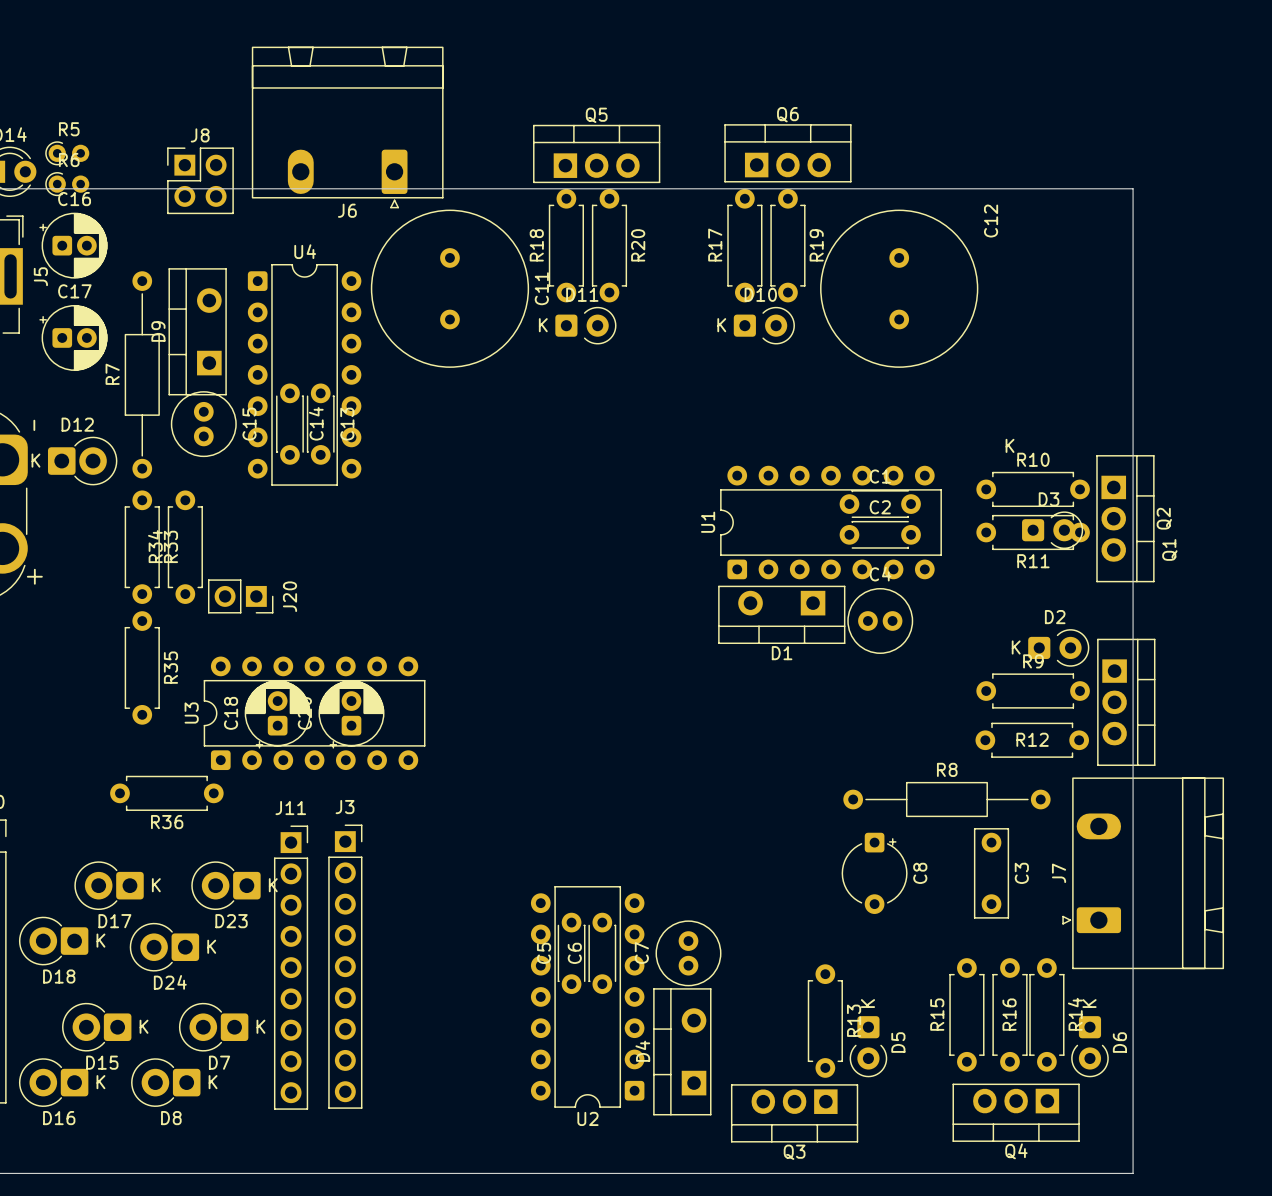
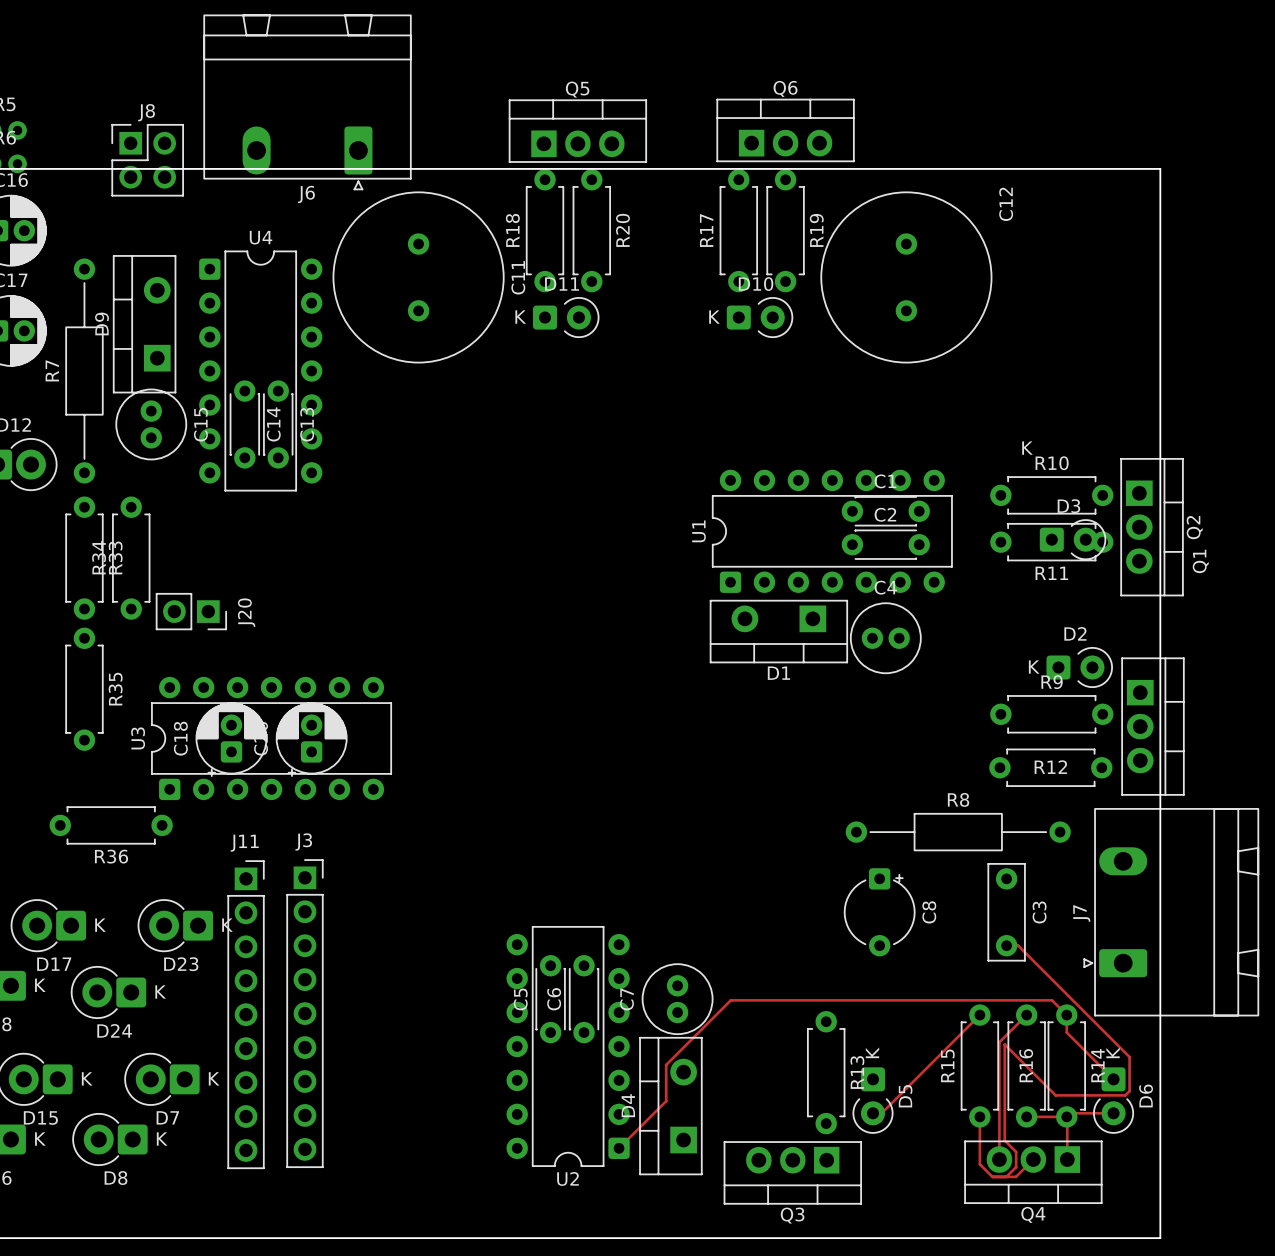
track: none -> (1006, 945) (1018, 945) (1129, 1057) (1129, 1091) (1125, 1095) (1055, 1095) (1004, 1044) (1004, 1140) (1016, 1151) (1016, 1167) (1006, 1176)
track: none -> (979, 1015) (881, 1113) (872, 1113)
track: none -> (1026, 1015) (999, 1042) (999, 1159)
track: none -> (1113, 1079) (1066, 1032) (1066, 1015) (1052, 1000) (730, 1000) (666, 1064) (666, 1101) (619, 1148)
track: none -> (1113, 1113) (1070, 1113) (1066, 1116)
track: none -> (979, 1116) (979, 1164) (992, 1176) (1015, 1176) (1033, 1159)
track: none -> (1026, 1116) (1066, 1116)
track: none -> (1066, 1116) (1067, 1159)

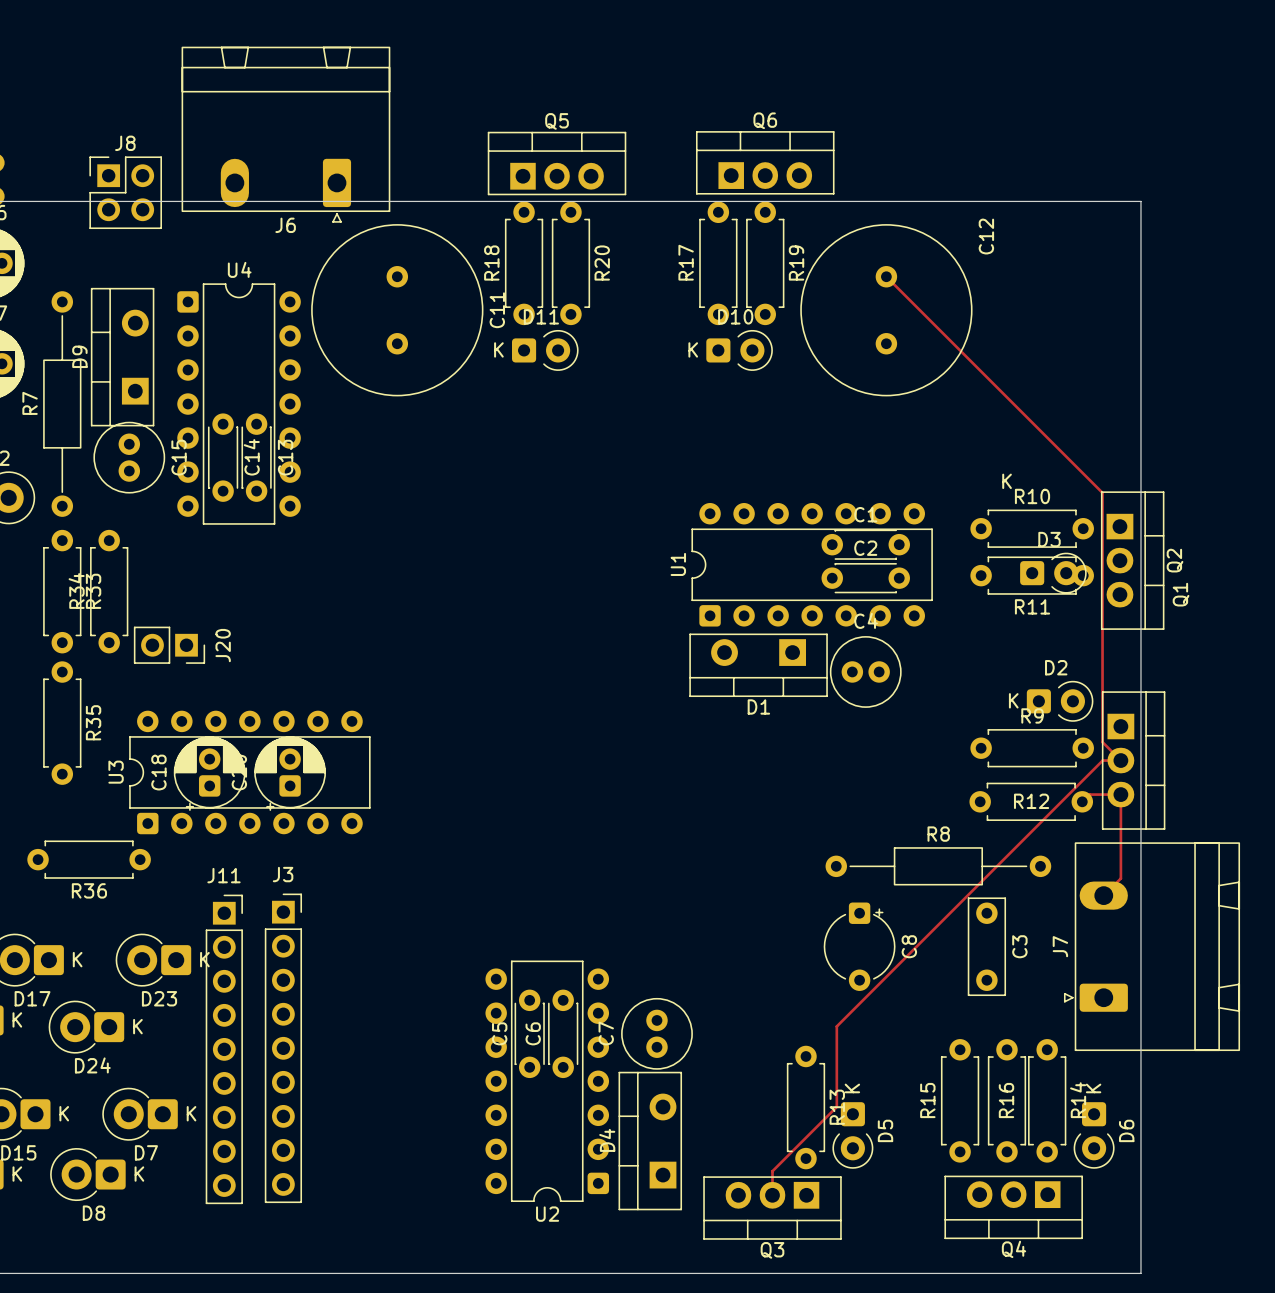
track: none -> (886, 276) (1102, 492) (1102, 742) (1120, 760) (1102, 760) (836, 1026) (836, 1106) (772, 1171) (772, 1195)
track: none -> (1082, 801) (1089, 794) (1120, 794) (1120, 878) (1103, 895)
track: (1006, 945) (1018, 945) (1129, 1057) (1129, 1091) (1125, 1095) (1055, 1095) (1004, 1044) (1004, 1140) (1016, 1151) (1016, 1167) (1006, 1176) -> none
track: (979, 1015) (881, 1113) (872, 1113) -> none
track: (1026, 1015) (999, 1042) (999, 1159) -> none
track: (1113, 1079) (1066, 1032) (1066, 1015) (1052, 1000) (730, 1000) (666, 1064) (666, 1101) (619, 1148) -> none
track: (1113, 1113) (1070, 1113) (1066, 1116) -> none
track: (979, 1116) (979, 1164) (992, 1176) (1015, 1176) (1033, 1159) -> none
track: (1026, 1116) (1066, 1116) -> none
track: (1066, 1116) (1067, 1159) -> none

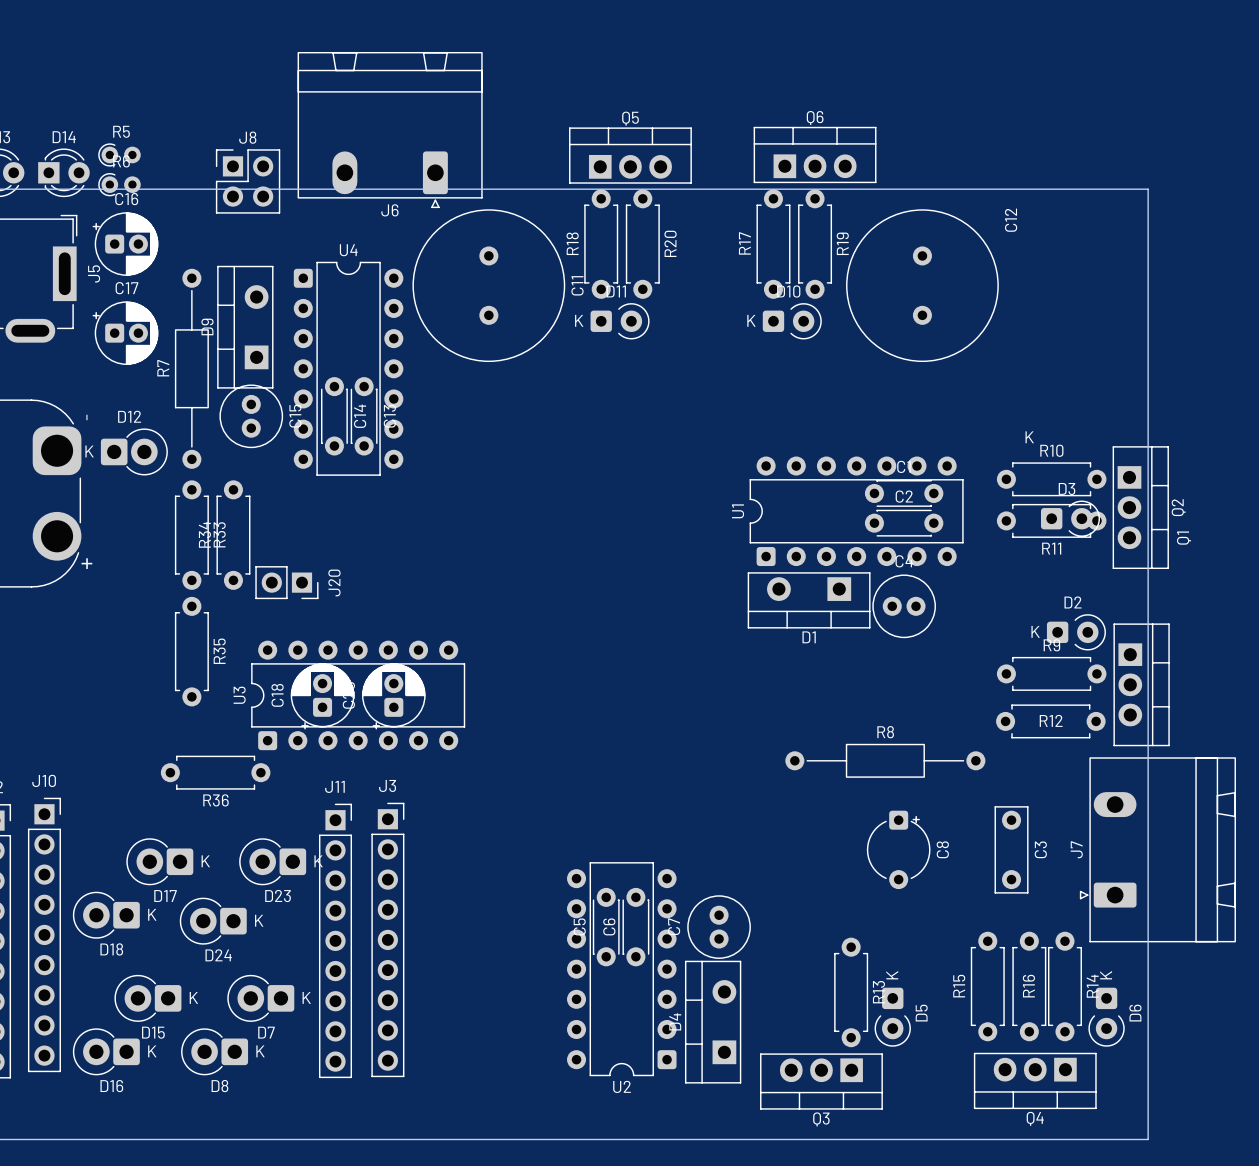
track: (886, 276) (1102, 492) (1102, 742) (1120, 760) (1102, 760) (836, 1026) (836, 1106) (772, 1171) (772, 1195) -> none
track: (1082, 801) (1089, 794) (1120, 794) (1120, 878) (1103, 895) -> none
R8 position: (938, 866) -> (885, 760)

